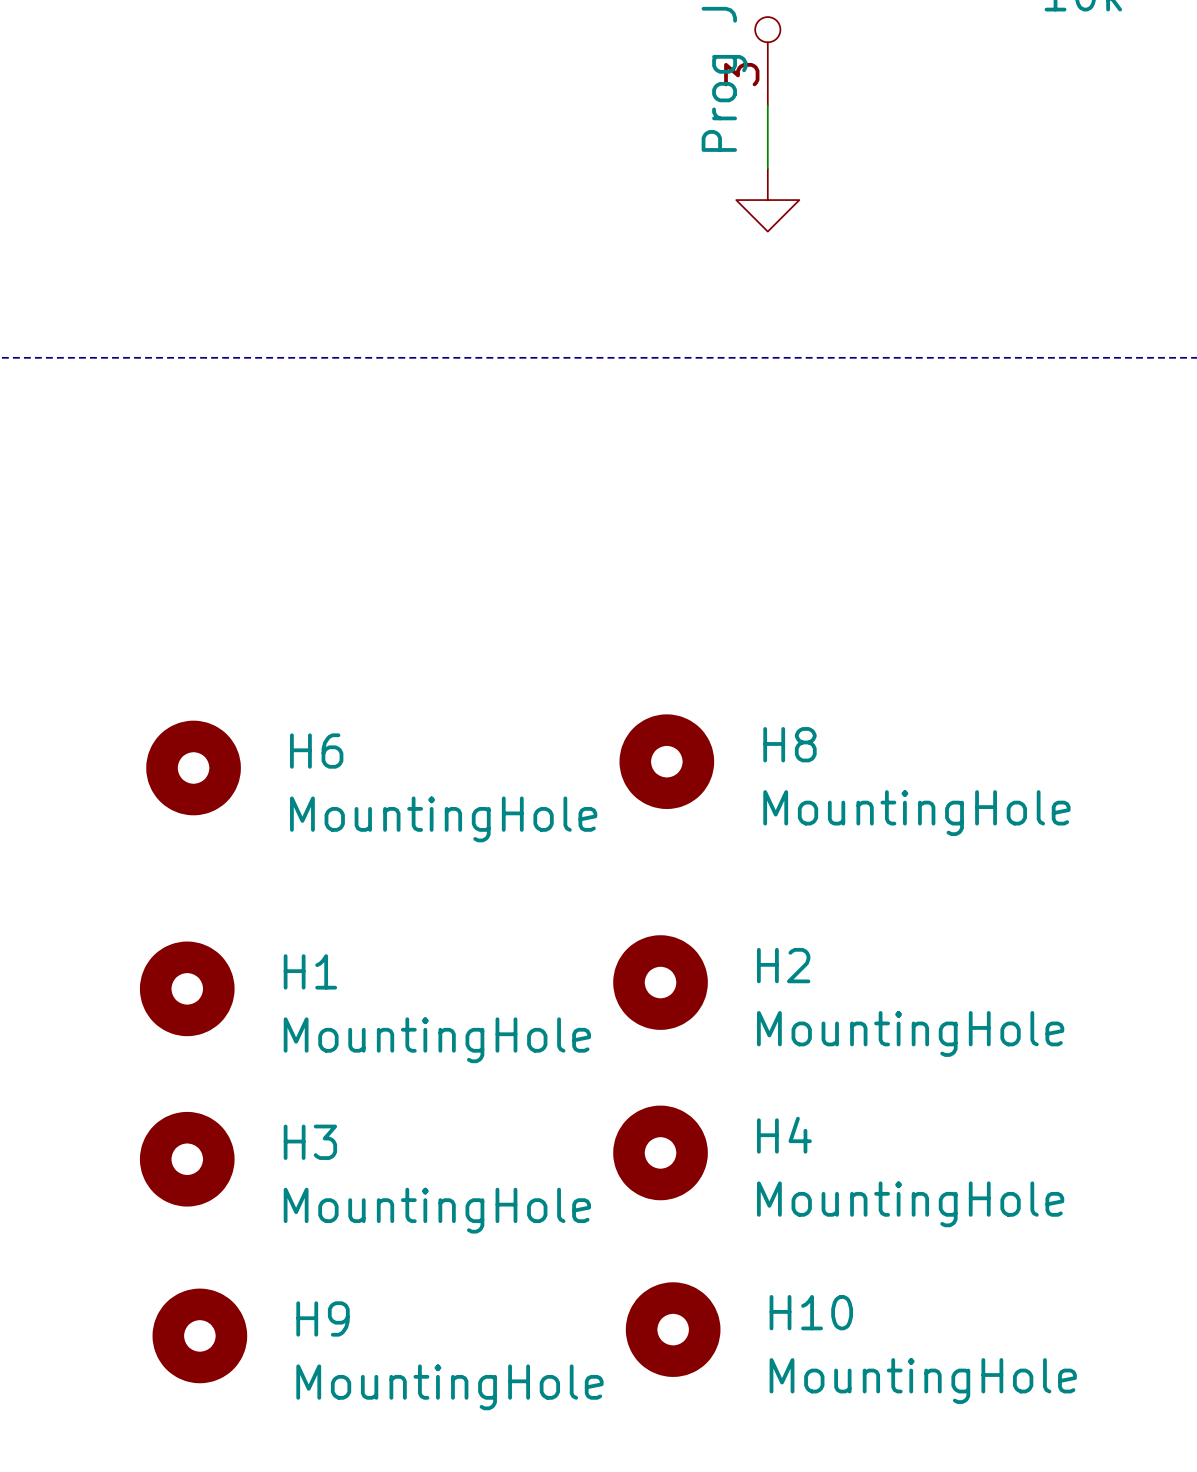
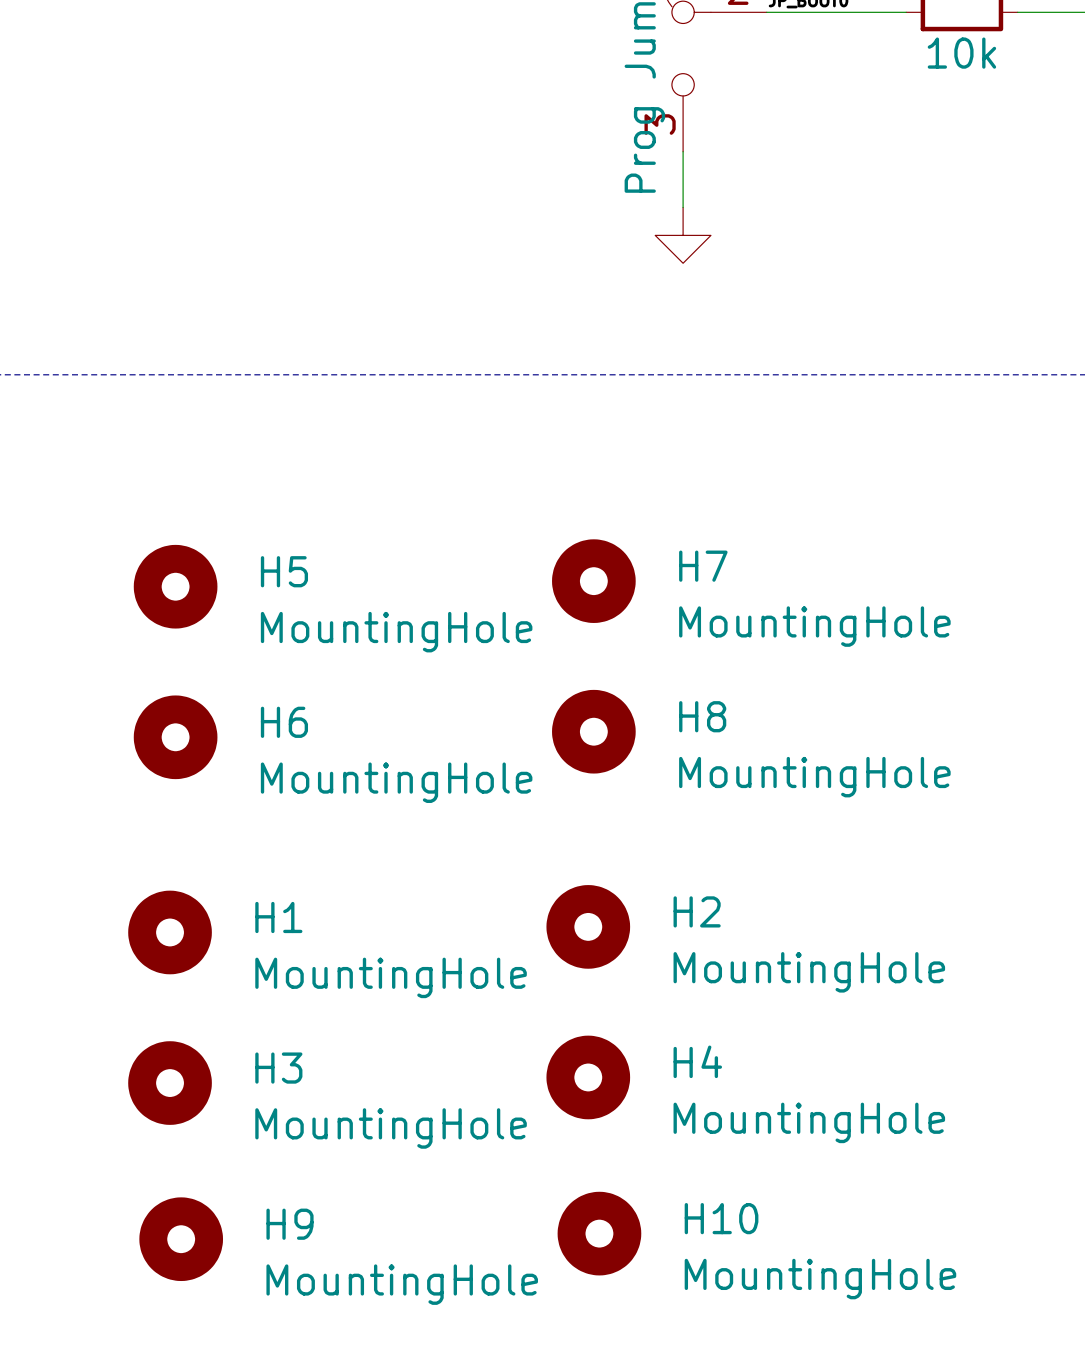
H7: none -> MountingHole (593, 581)
H5: none -> MountingHole (175, 586)

